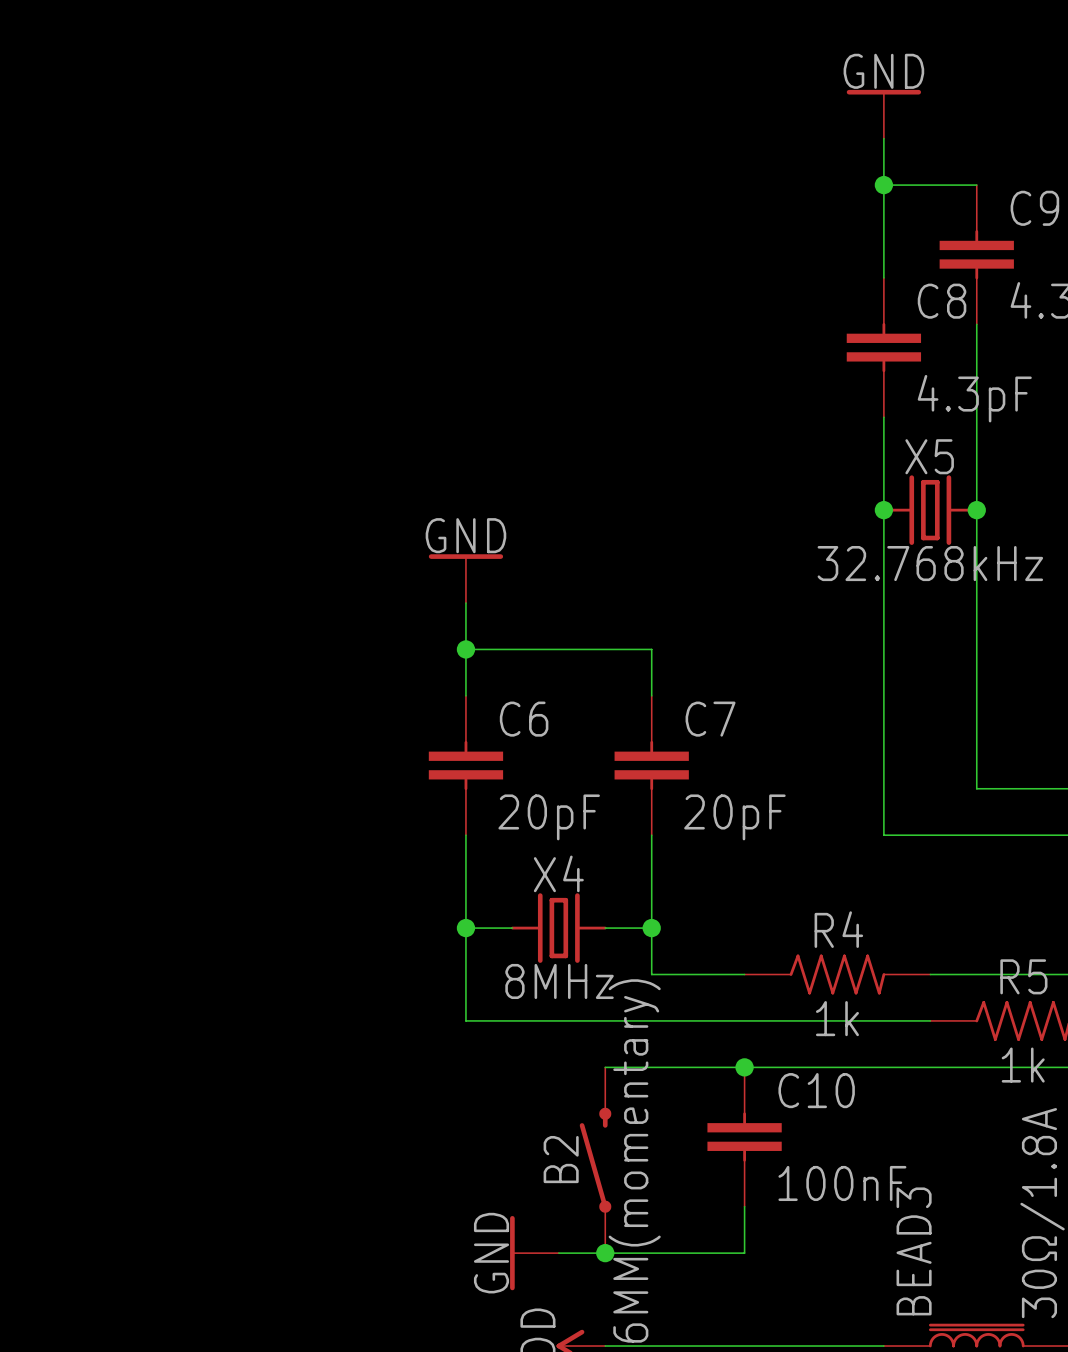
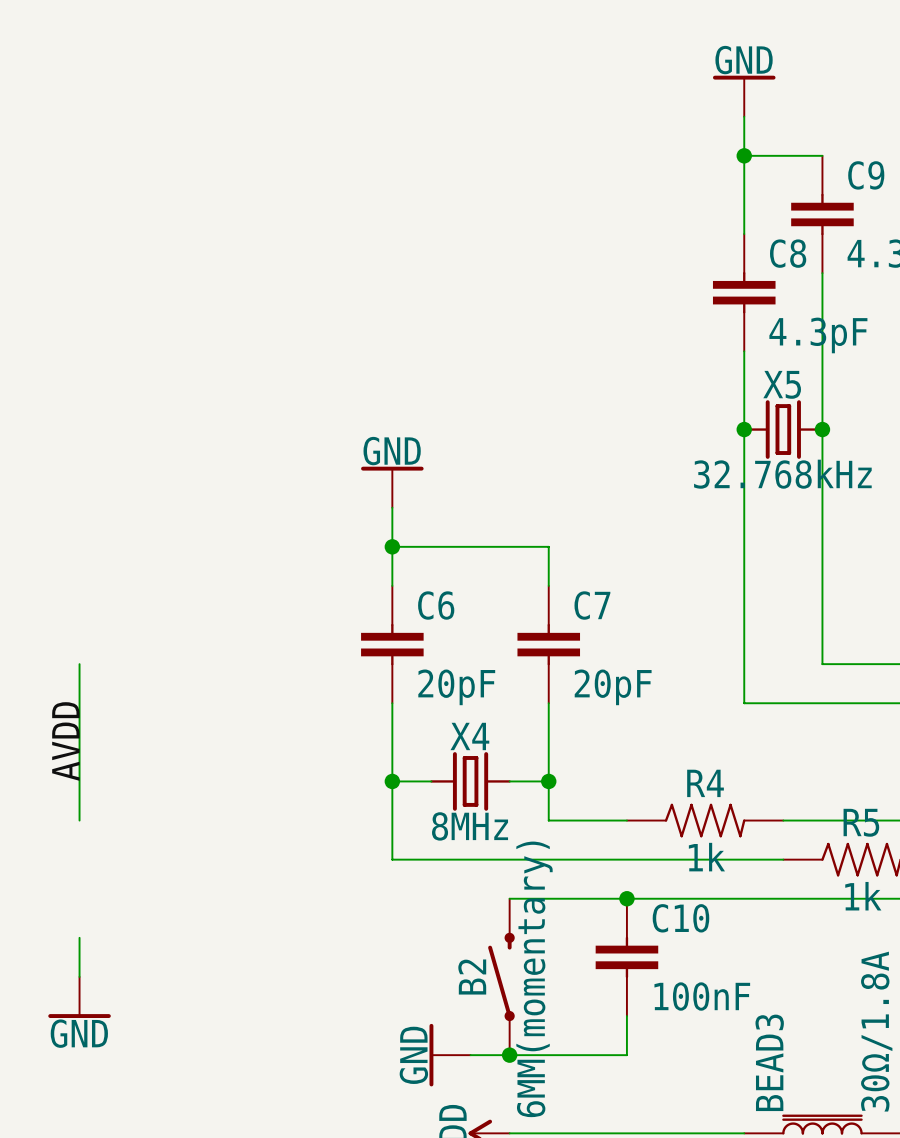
wire: none -> (79, 664) (79, 820)
label: none -> AVDD (65, 741)
wire: none -> (79, 937) (79, 976)
power symbol: none -> GND (79, 997)

